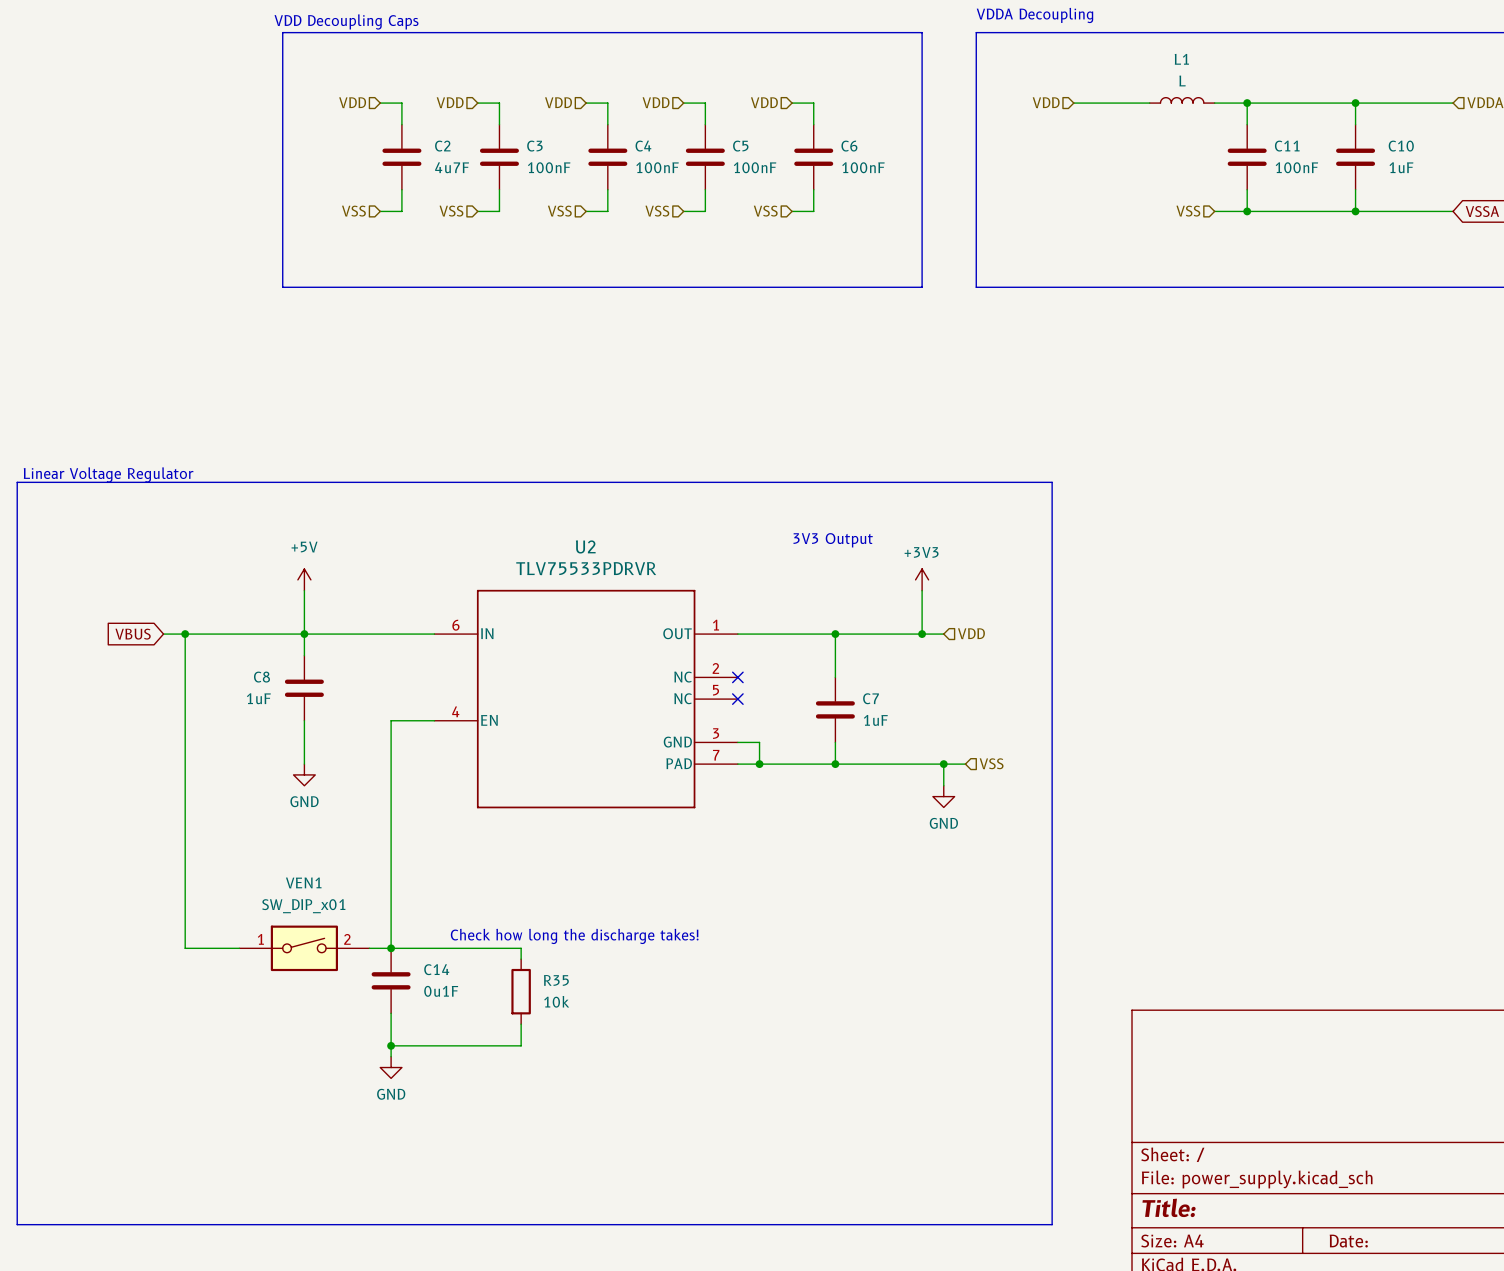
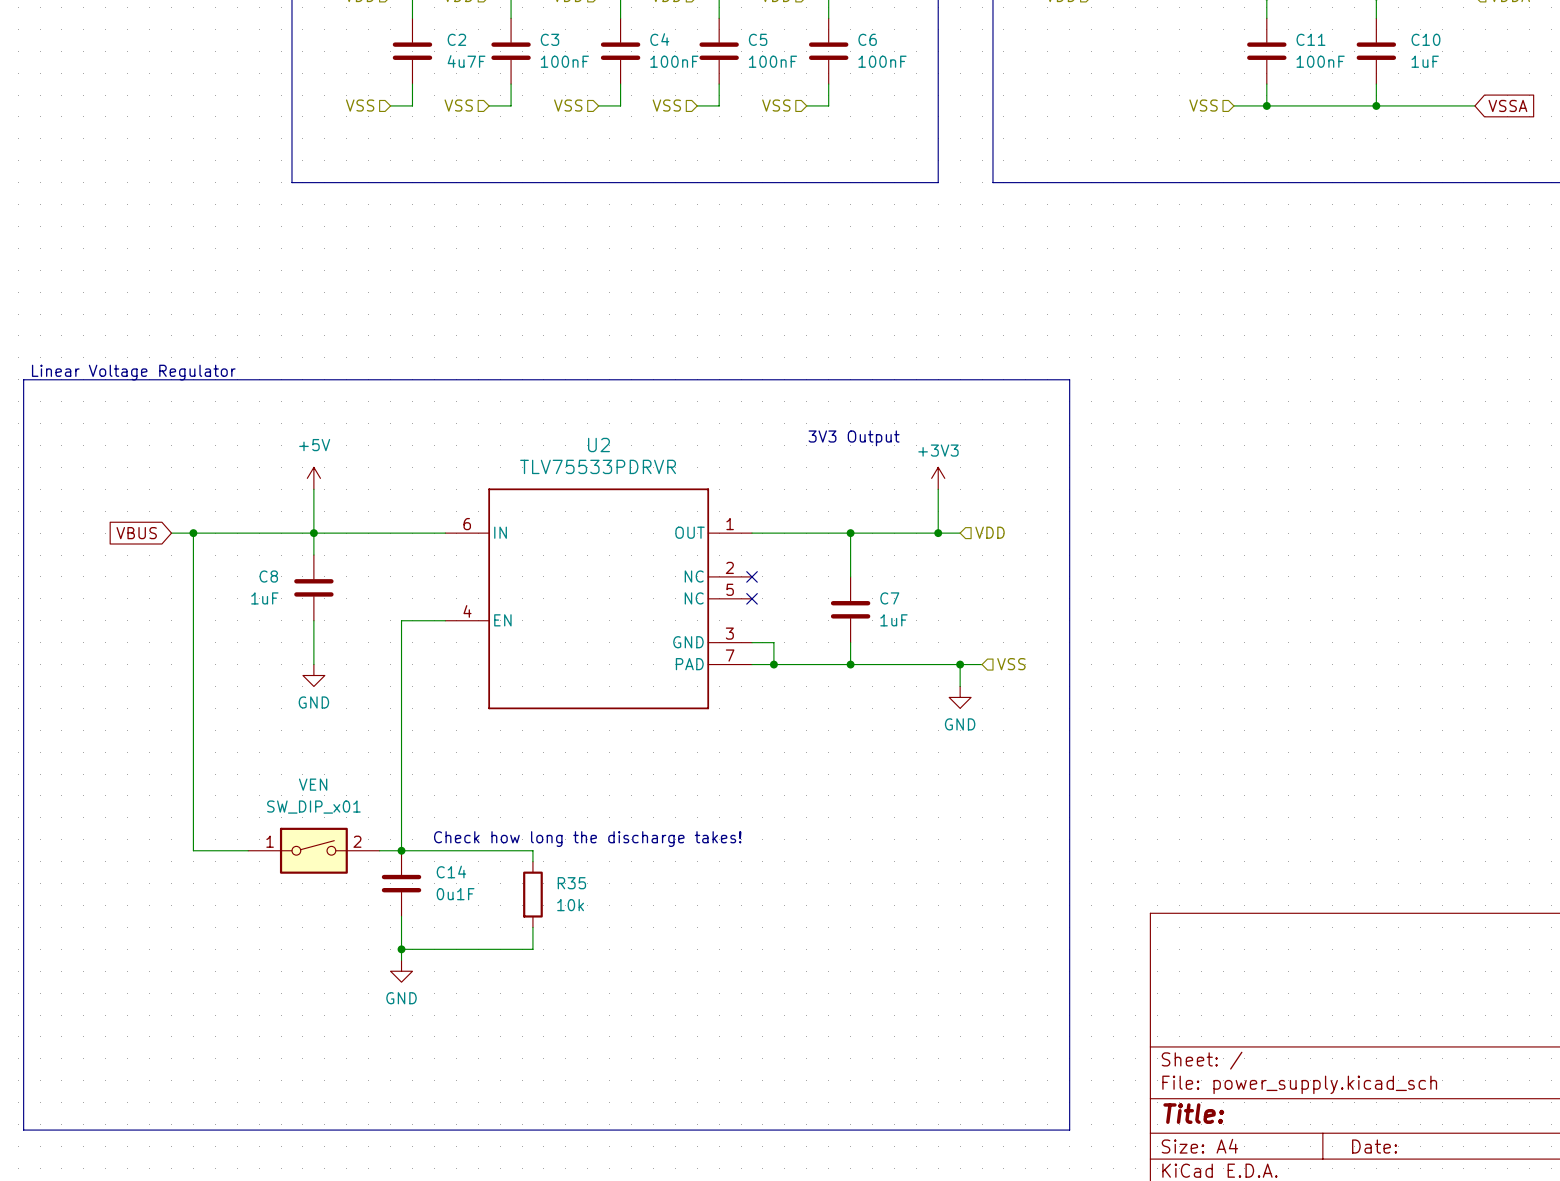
VEN1 name: VEN1 (303, 882) -> VEN (313, 784)

